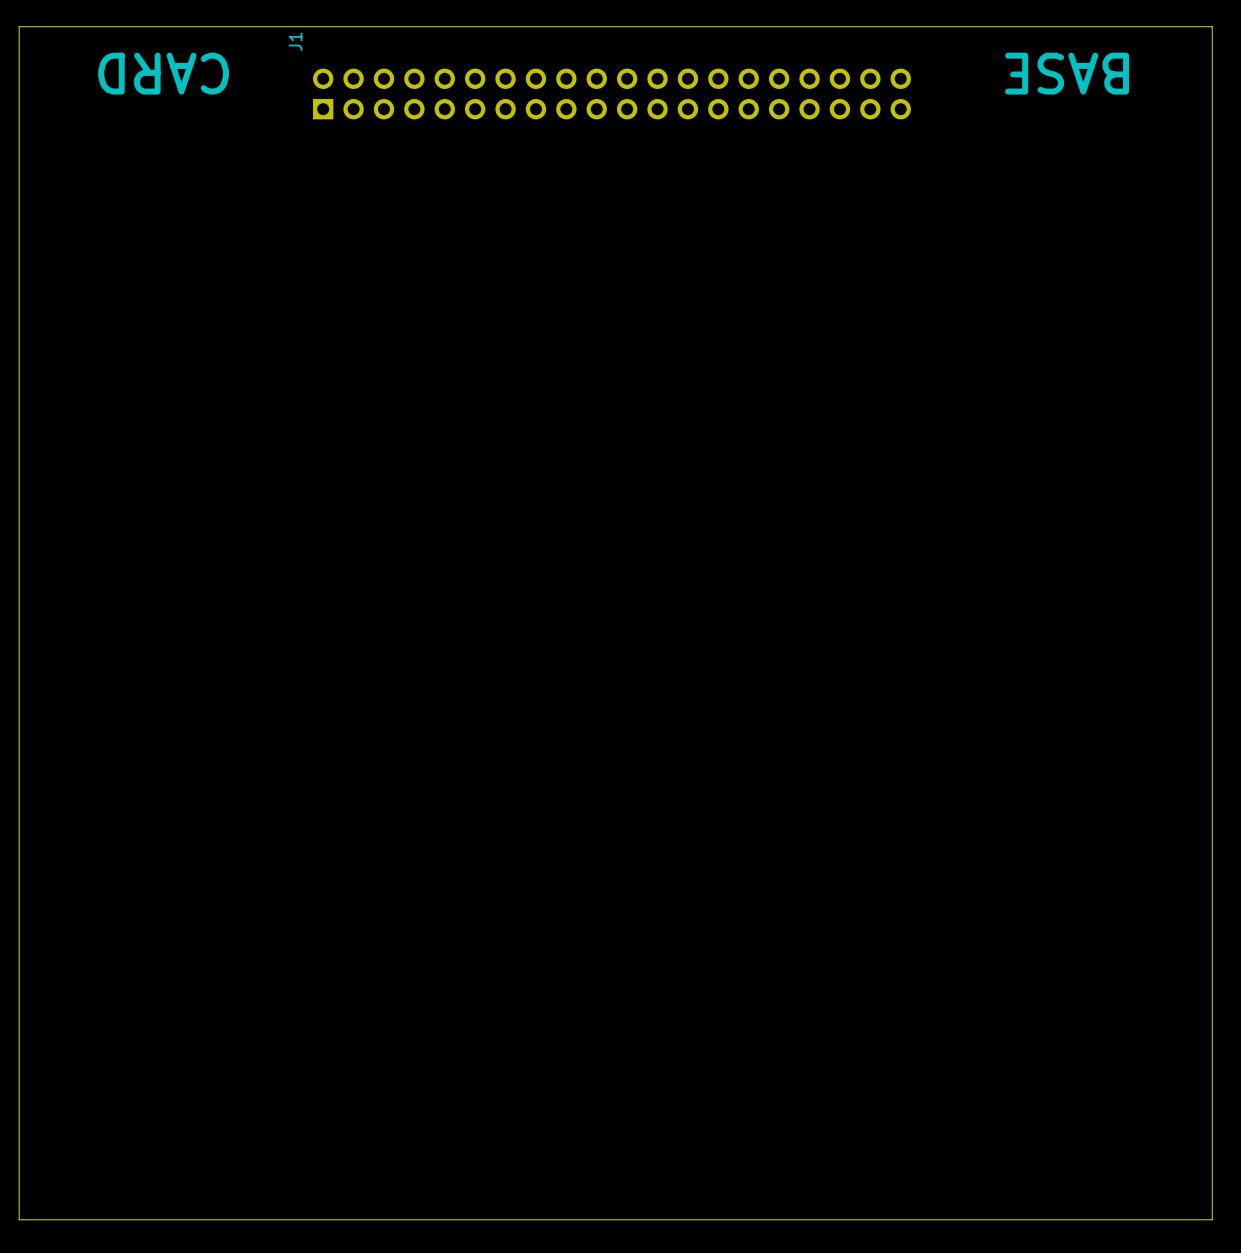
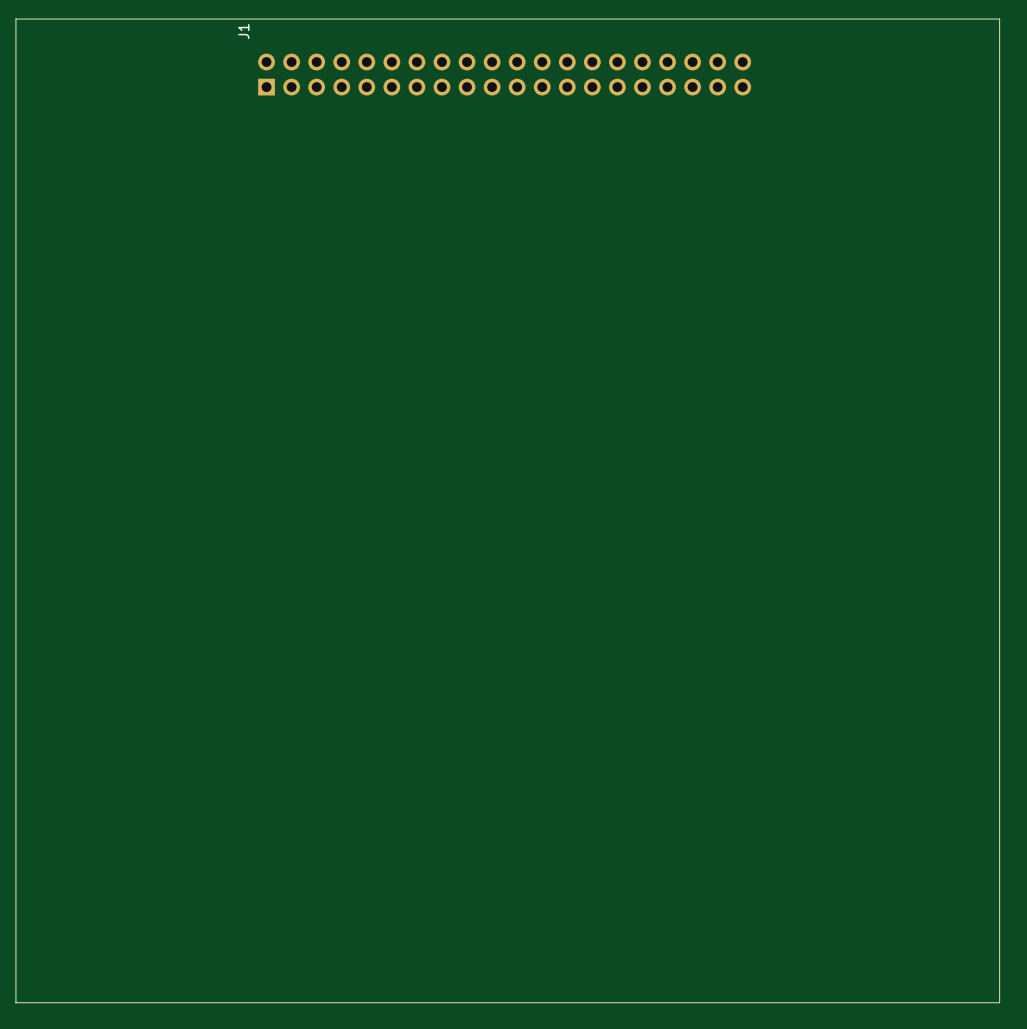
text: CARD (163, 73) -> none
text: BASE (1067, 73) -> none

